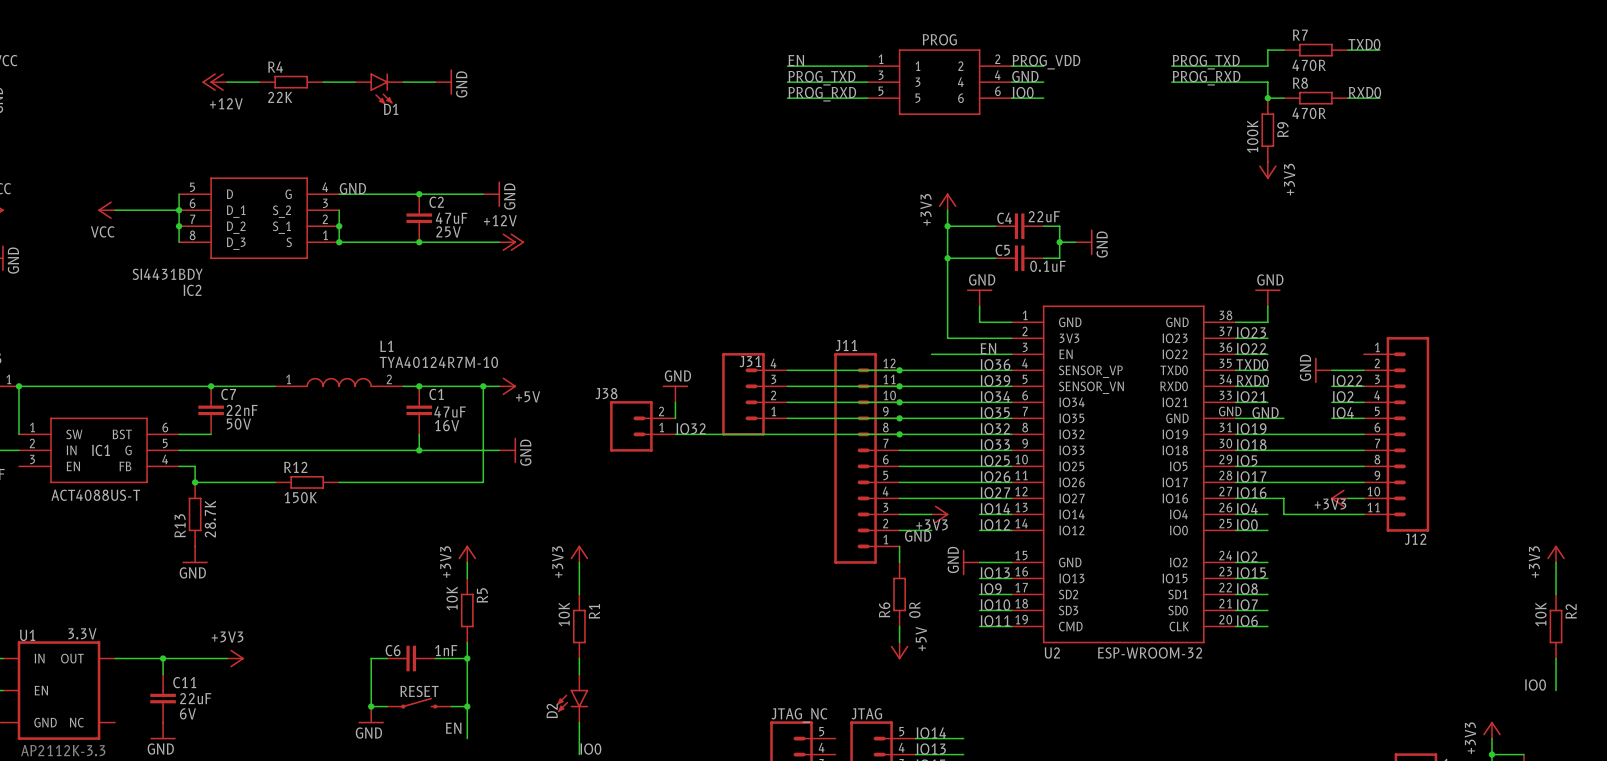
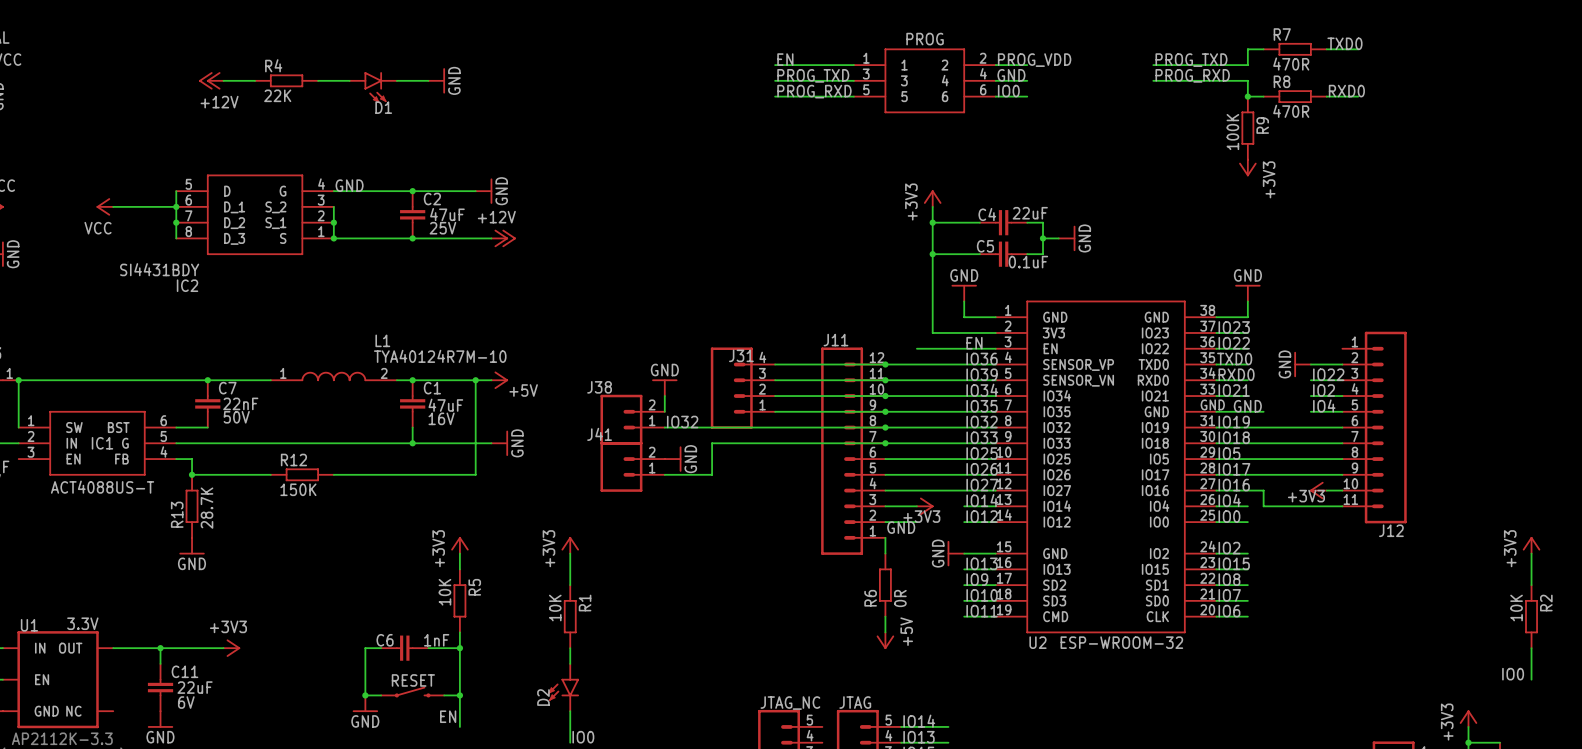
wire: none -> (885, 443) (712, 443) (712, 474) (664, 474)
junction: none -> (885, 443)
power symbol: none -> GND (673, 459)
J41: none -> (632, 466)

